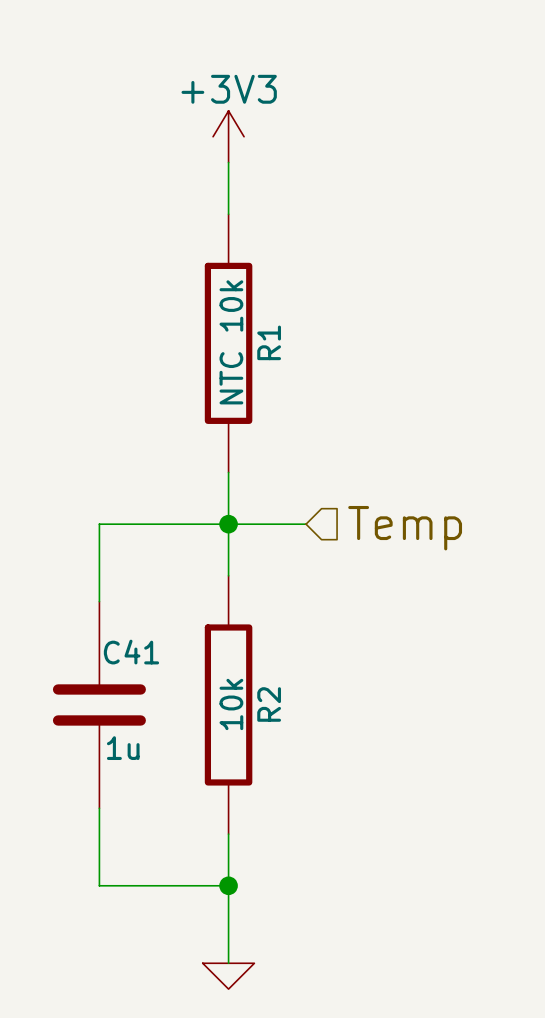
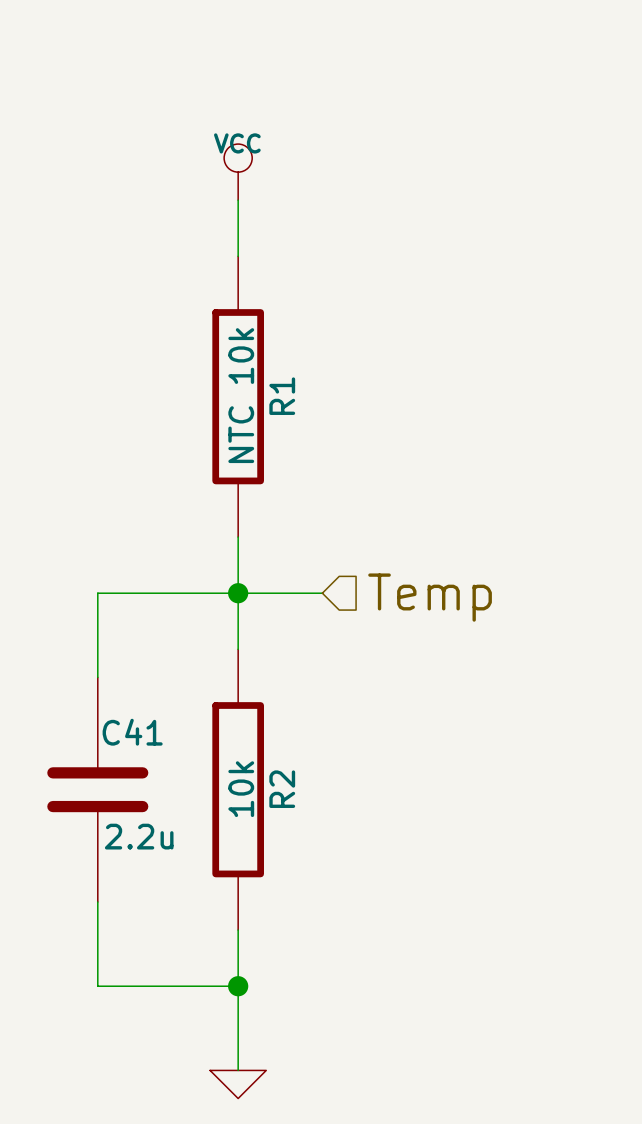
power symbol: +3V3 (228, 136) -> VCC (238, 172)
C41 value: 1u (123, 748) -> 2.2u (139, 836)

